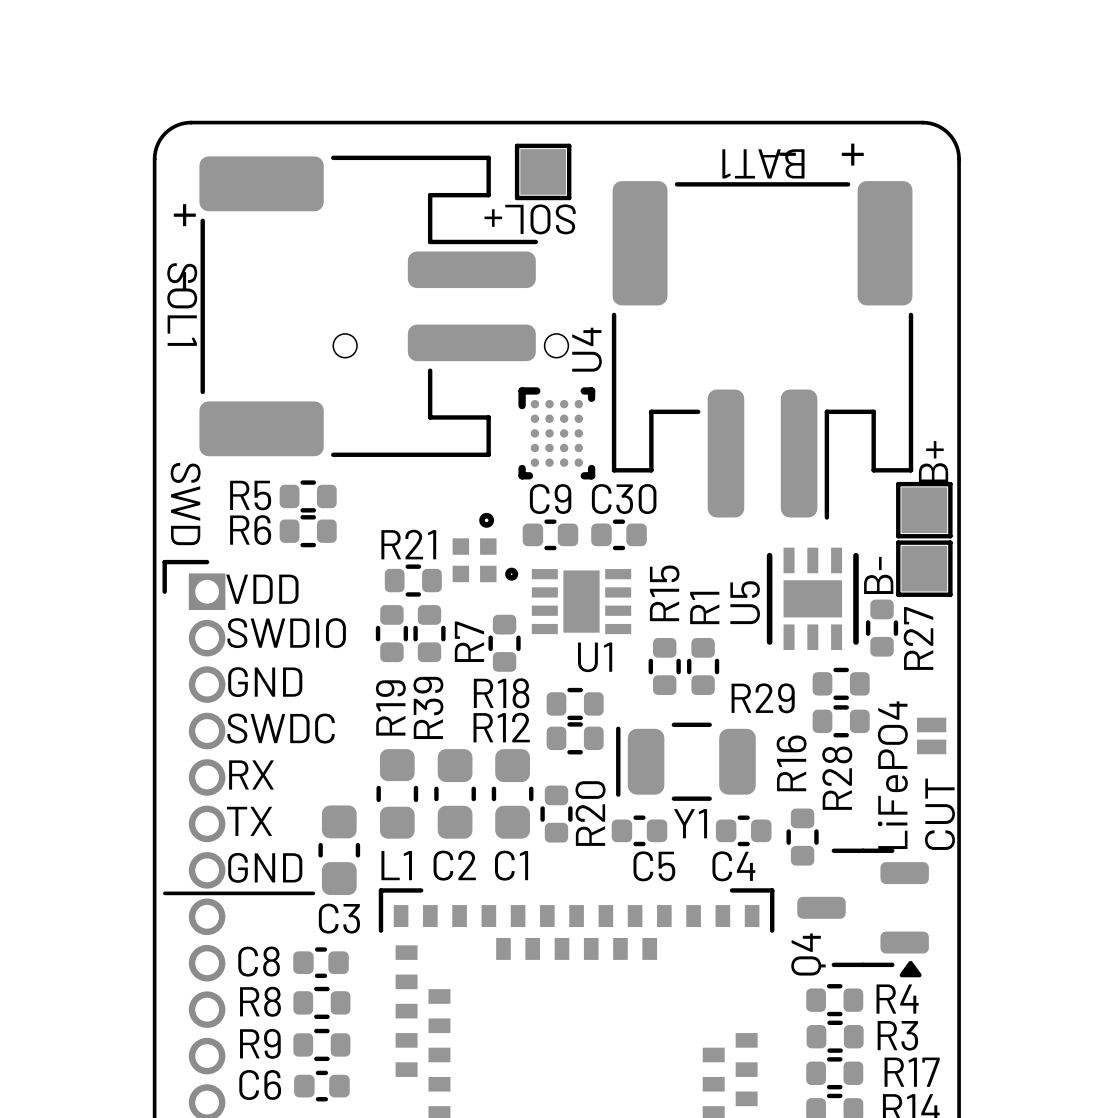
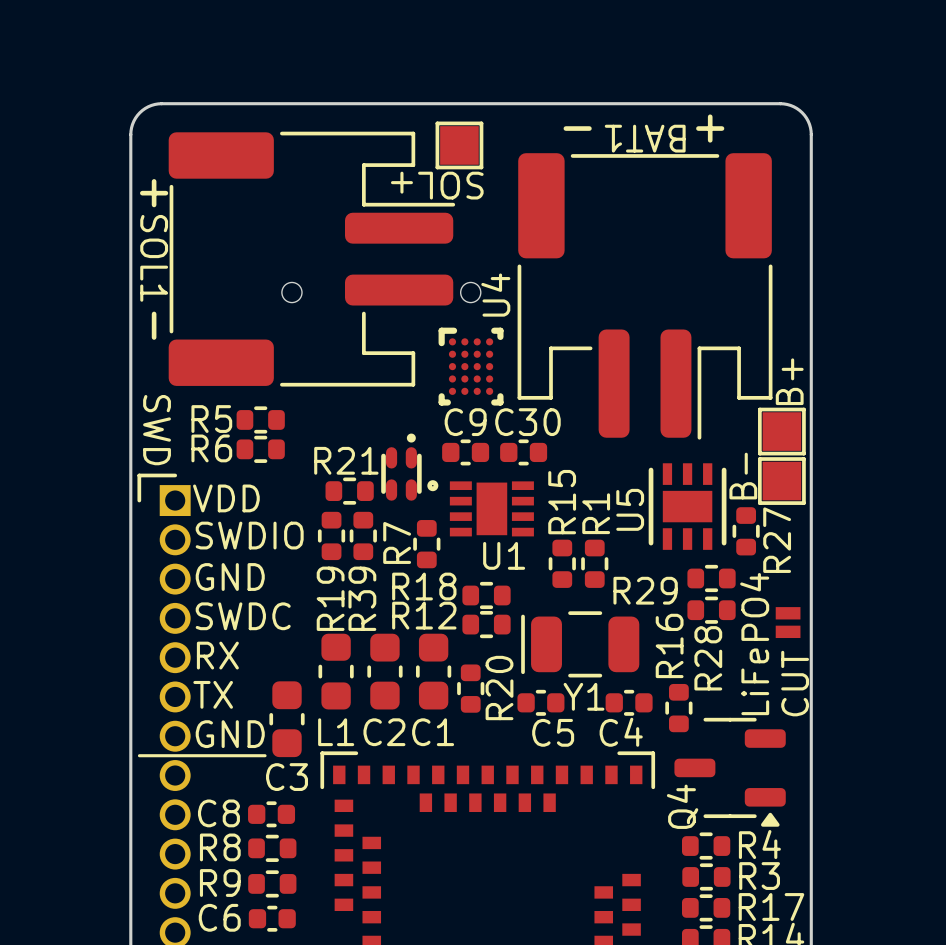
part footprint: [452, 512, 497, 583] -> [381, 433, 422, 501]

